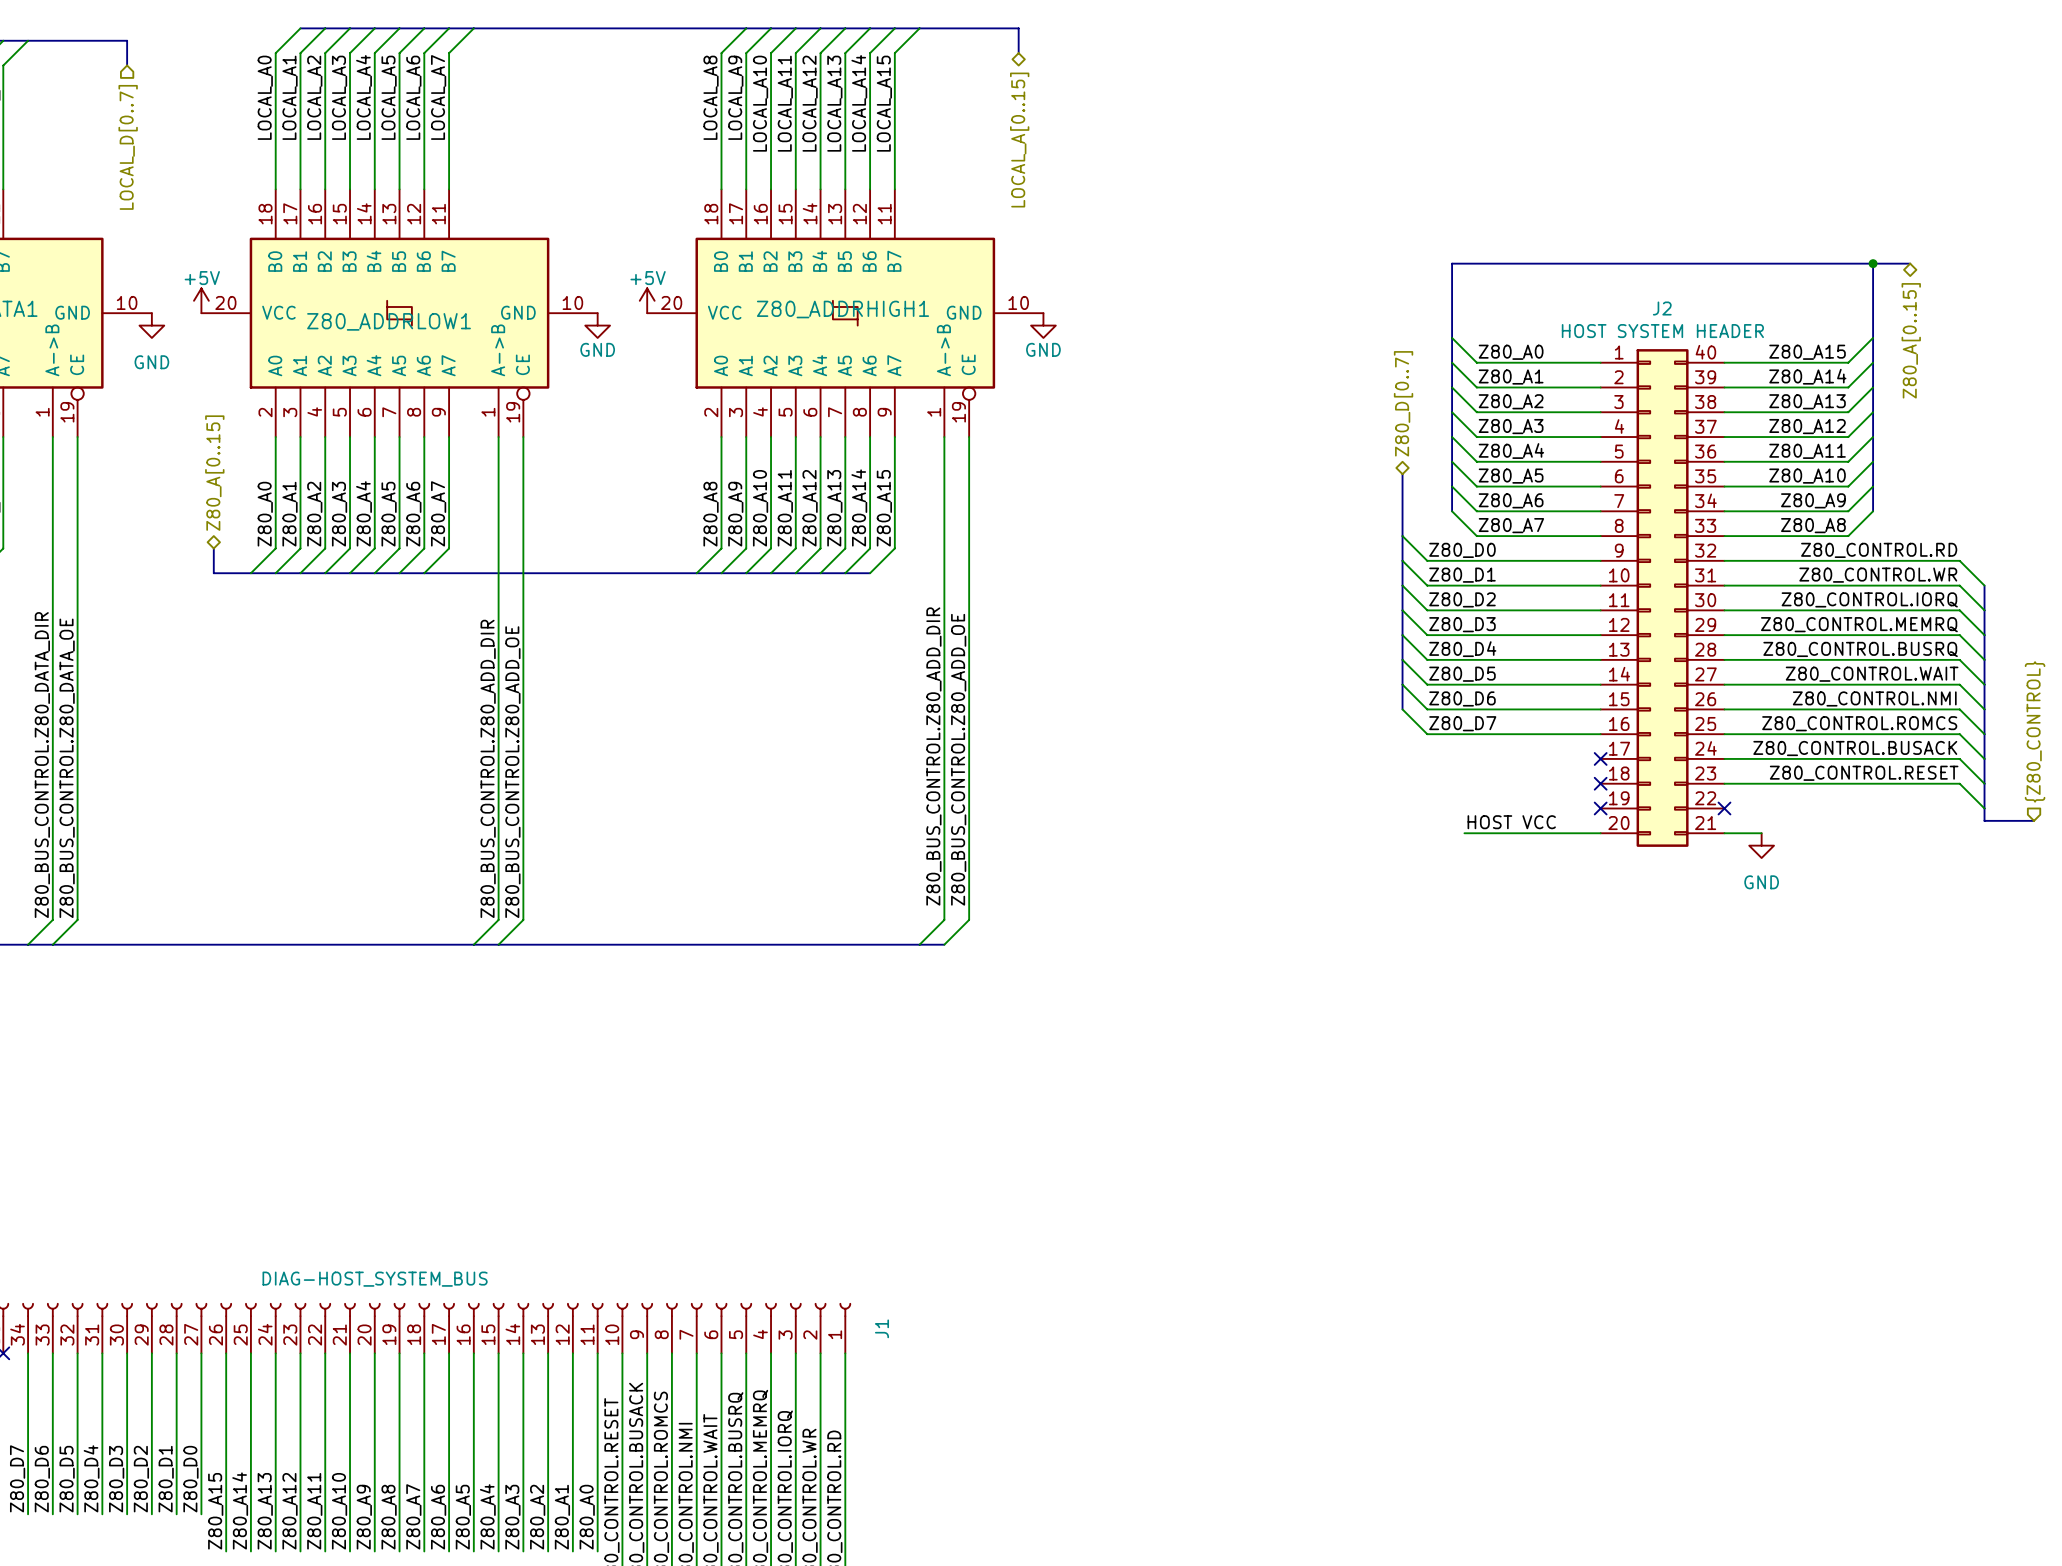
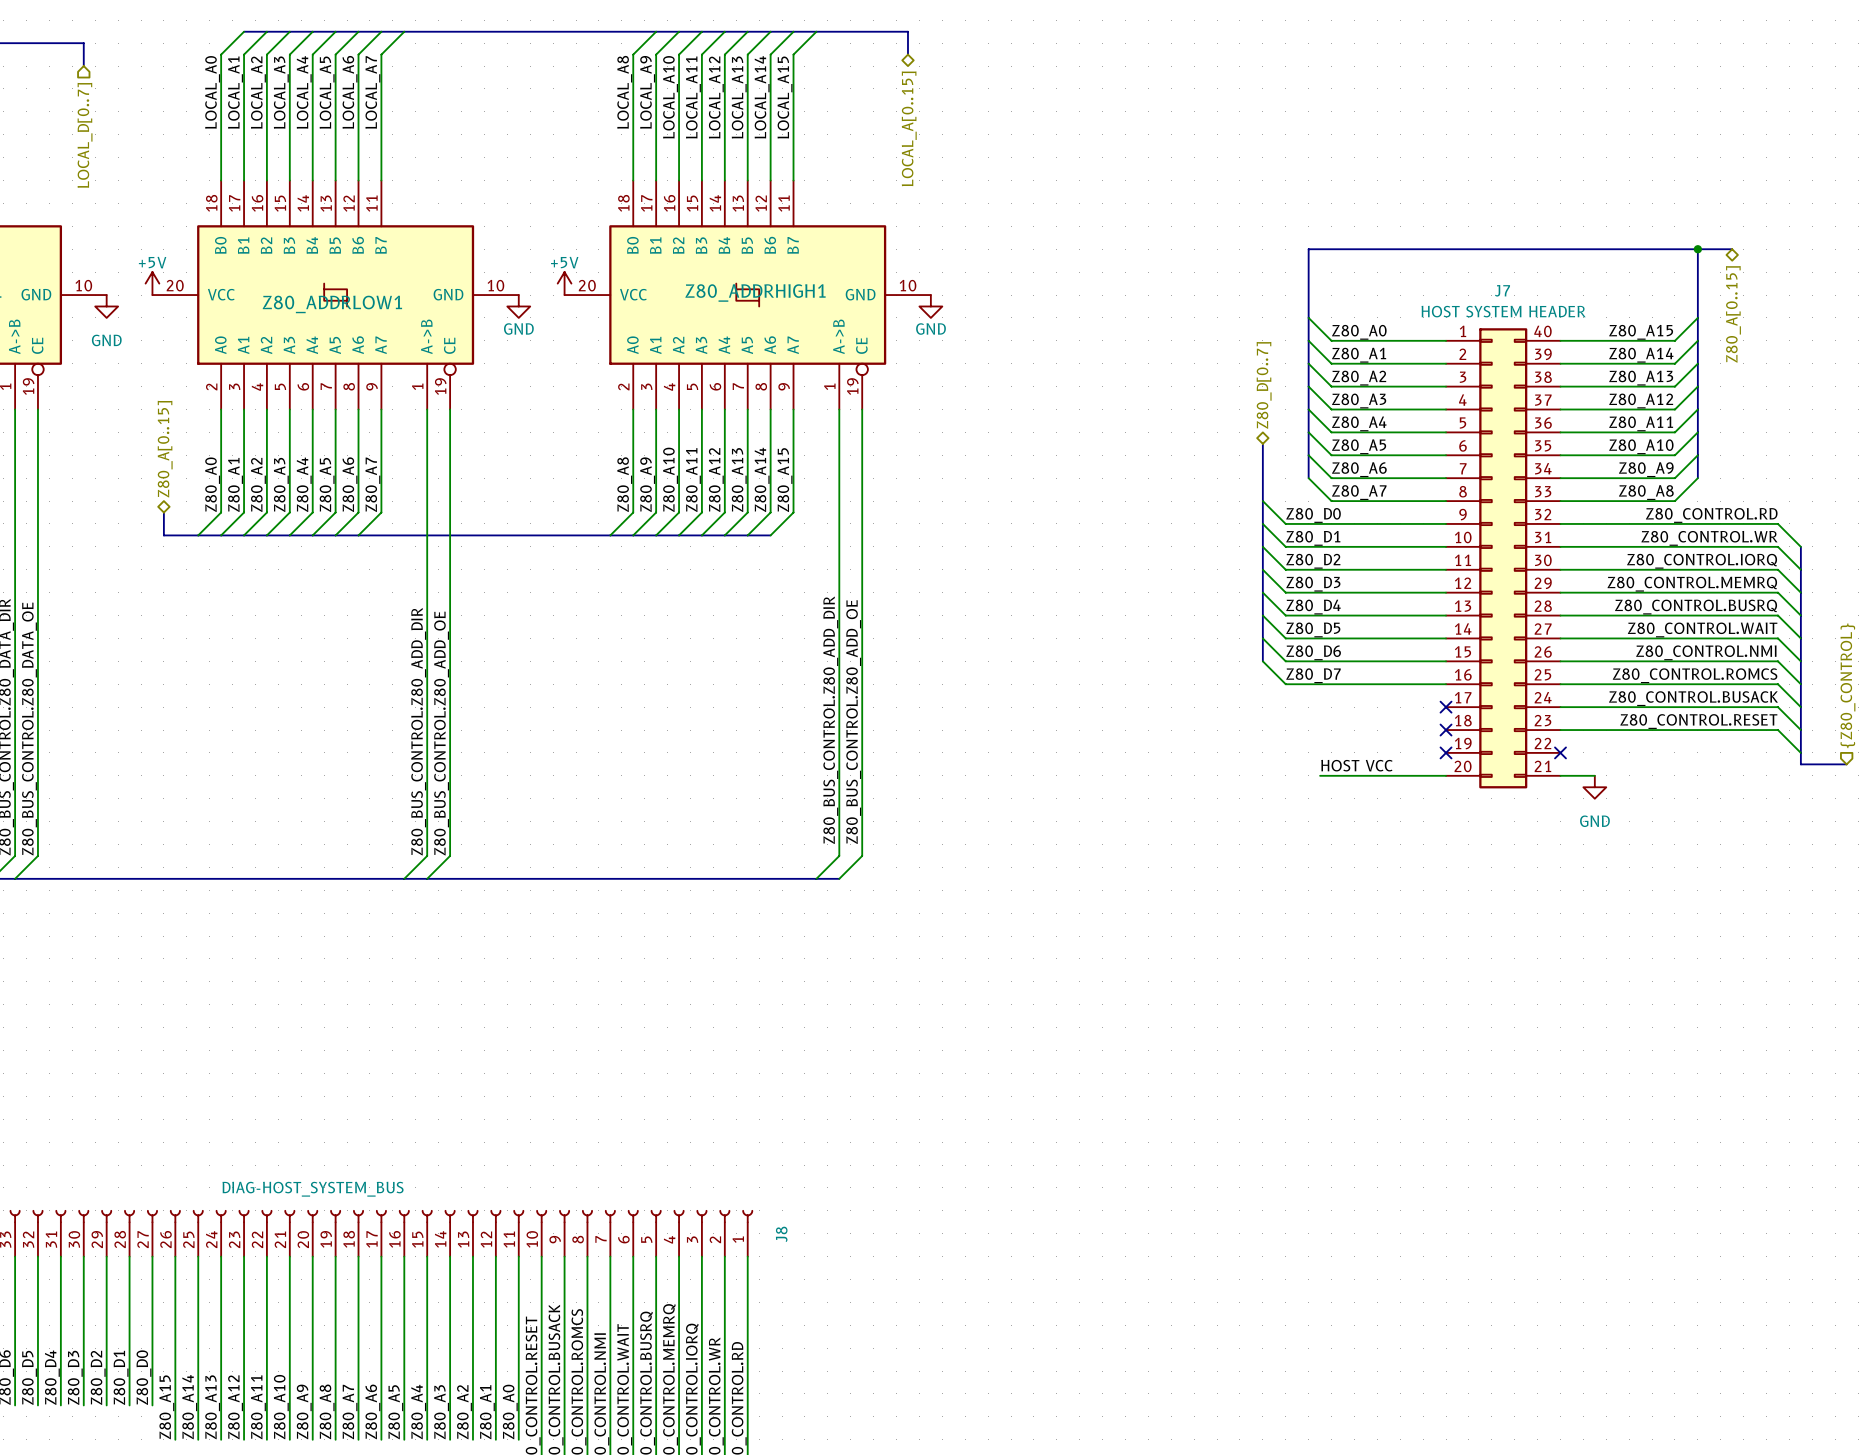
J2 name: J2 (1662, 308) -> J7 (1502, 290)
J1 name: J1 (882, 1328) -> J8 (781, 1234)

